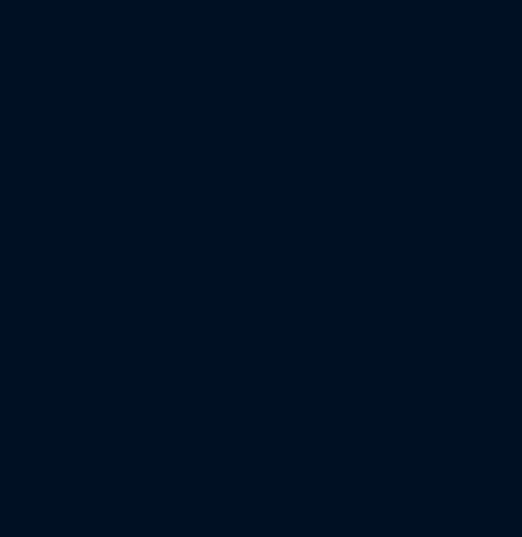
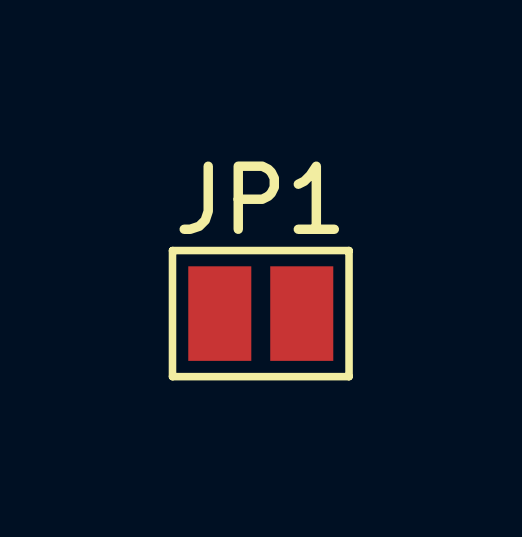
JP1: none -> (260, 313)

